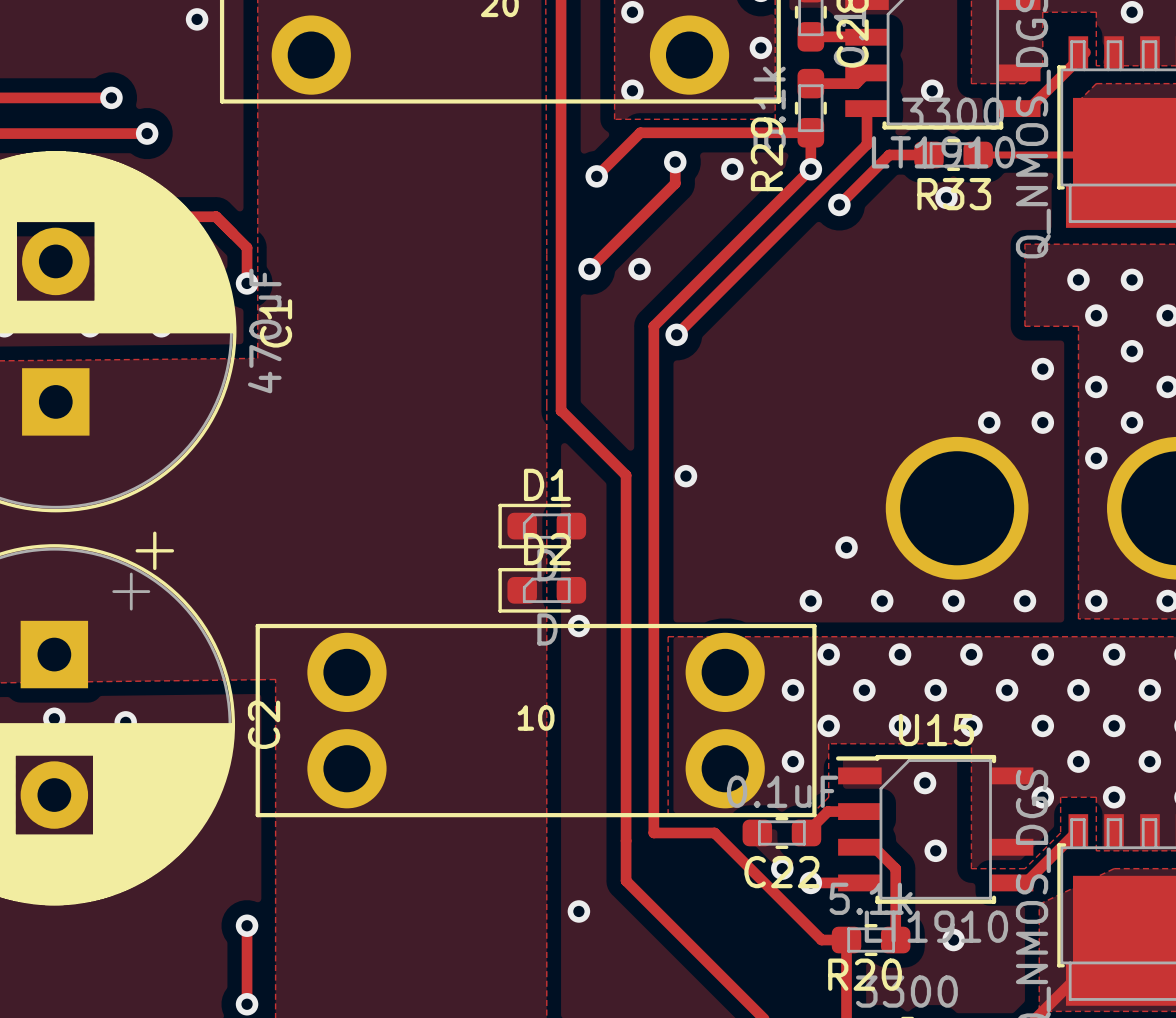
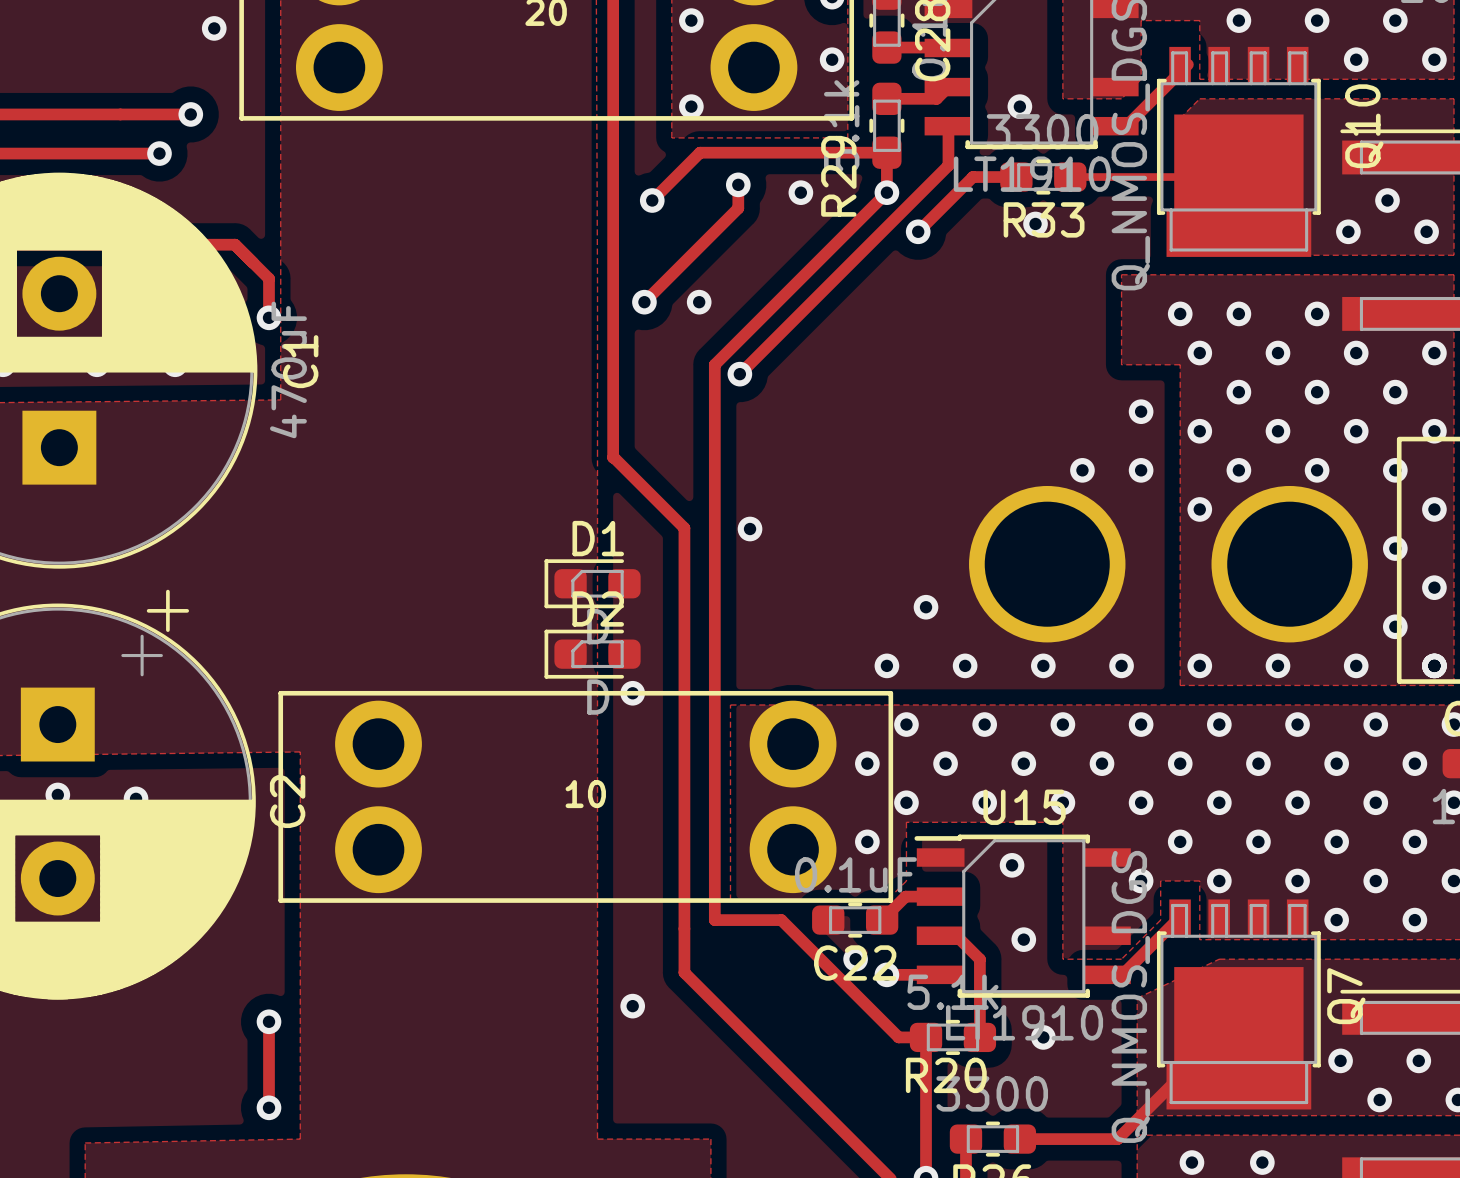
track: none -> (120, 114) (190, 114)
via position: (111, 97) -> (190, 114)

